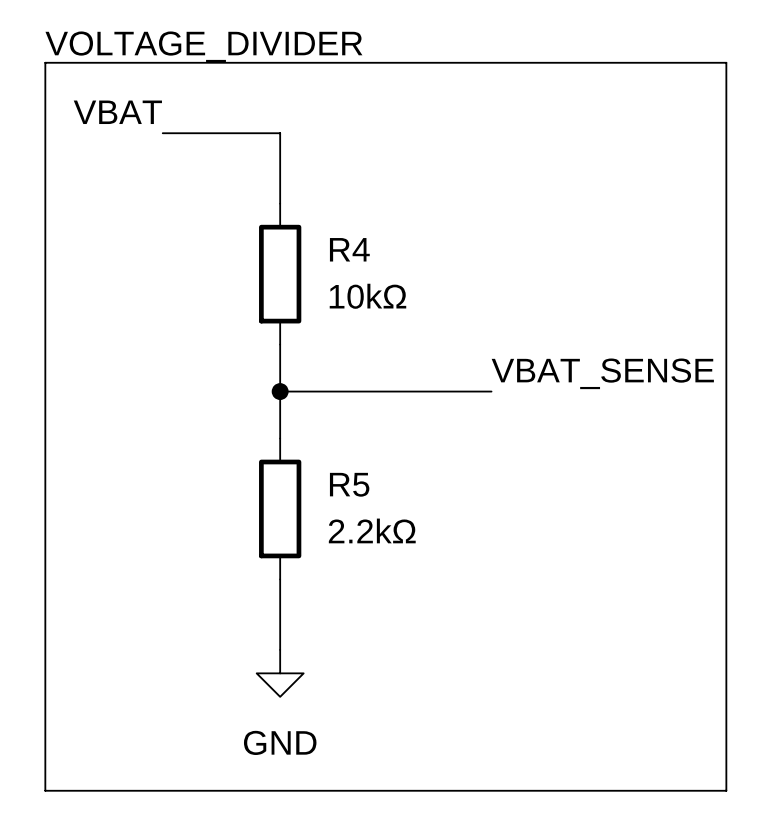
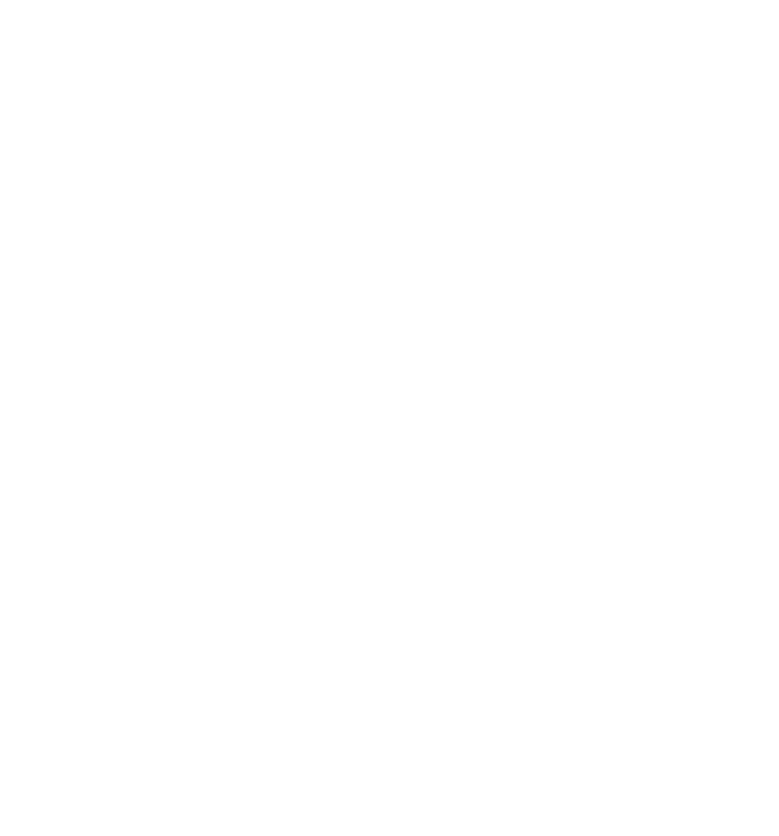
text: VOLTAGE_DIVIDER (203, 46) -> none
line: (45, 62) (726, 62) (726, 790) (45, 790) (45, 62) -> none
label: VBAT (117, 112) -> none
wire: (162, 133) (280, 133) (280, 203) -> none
R4: 10kΩ (280, 274) -> none
wire: (280, 344) (280, 438) -> none
label: VBAT_SENSE (602, 373) -> none
wire: (280, 391) (491, 391) -> none
junction: (280, 391) -> none
R5: 2.2kΩ (280, 508) -> none
wire: (280, 579) (280, 649) -> none
power symbol: GND (280, 673) -> none

